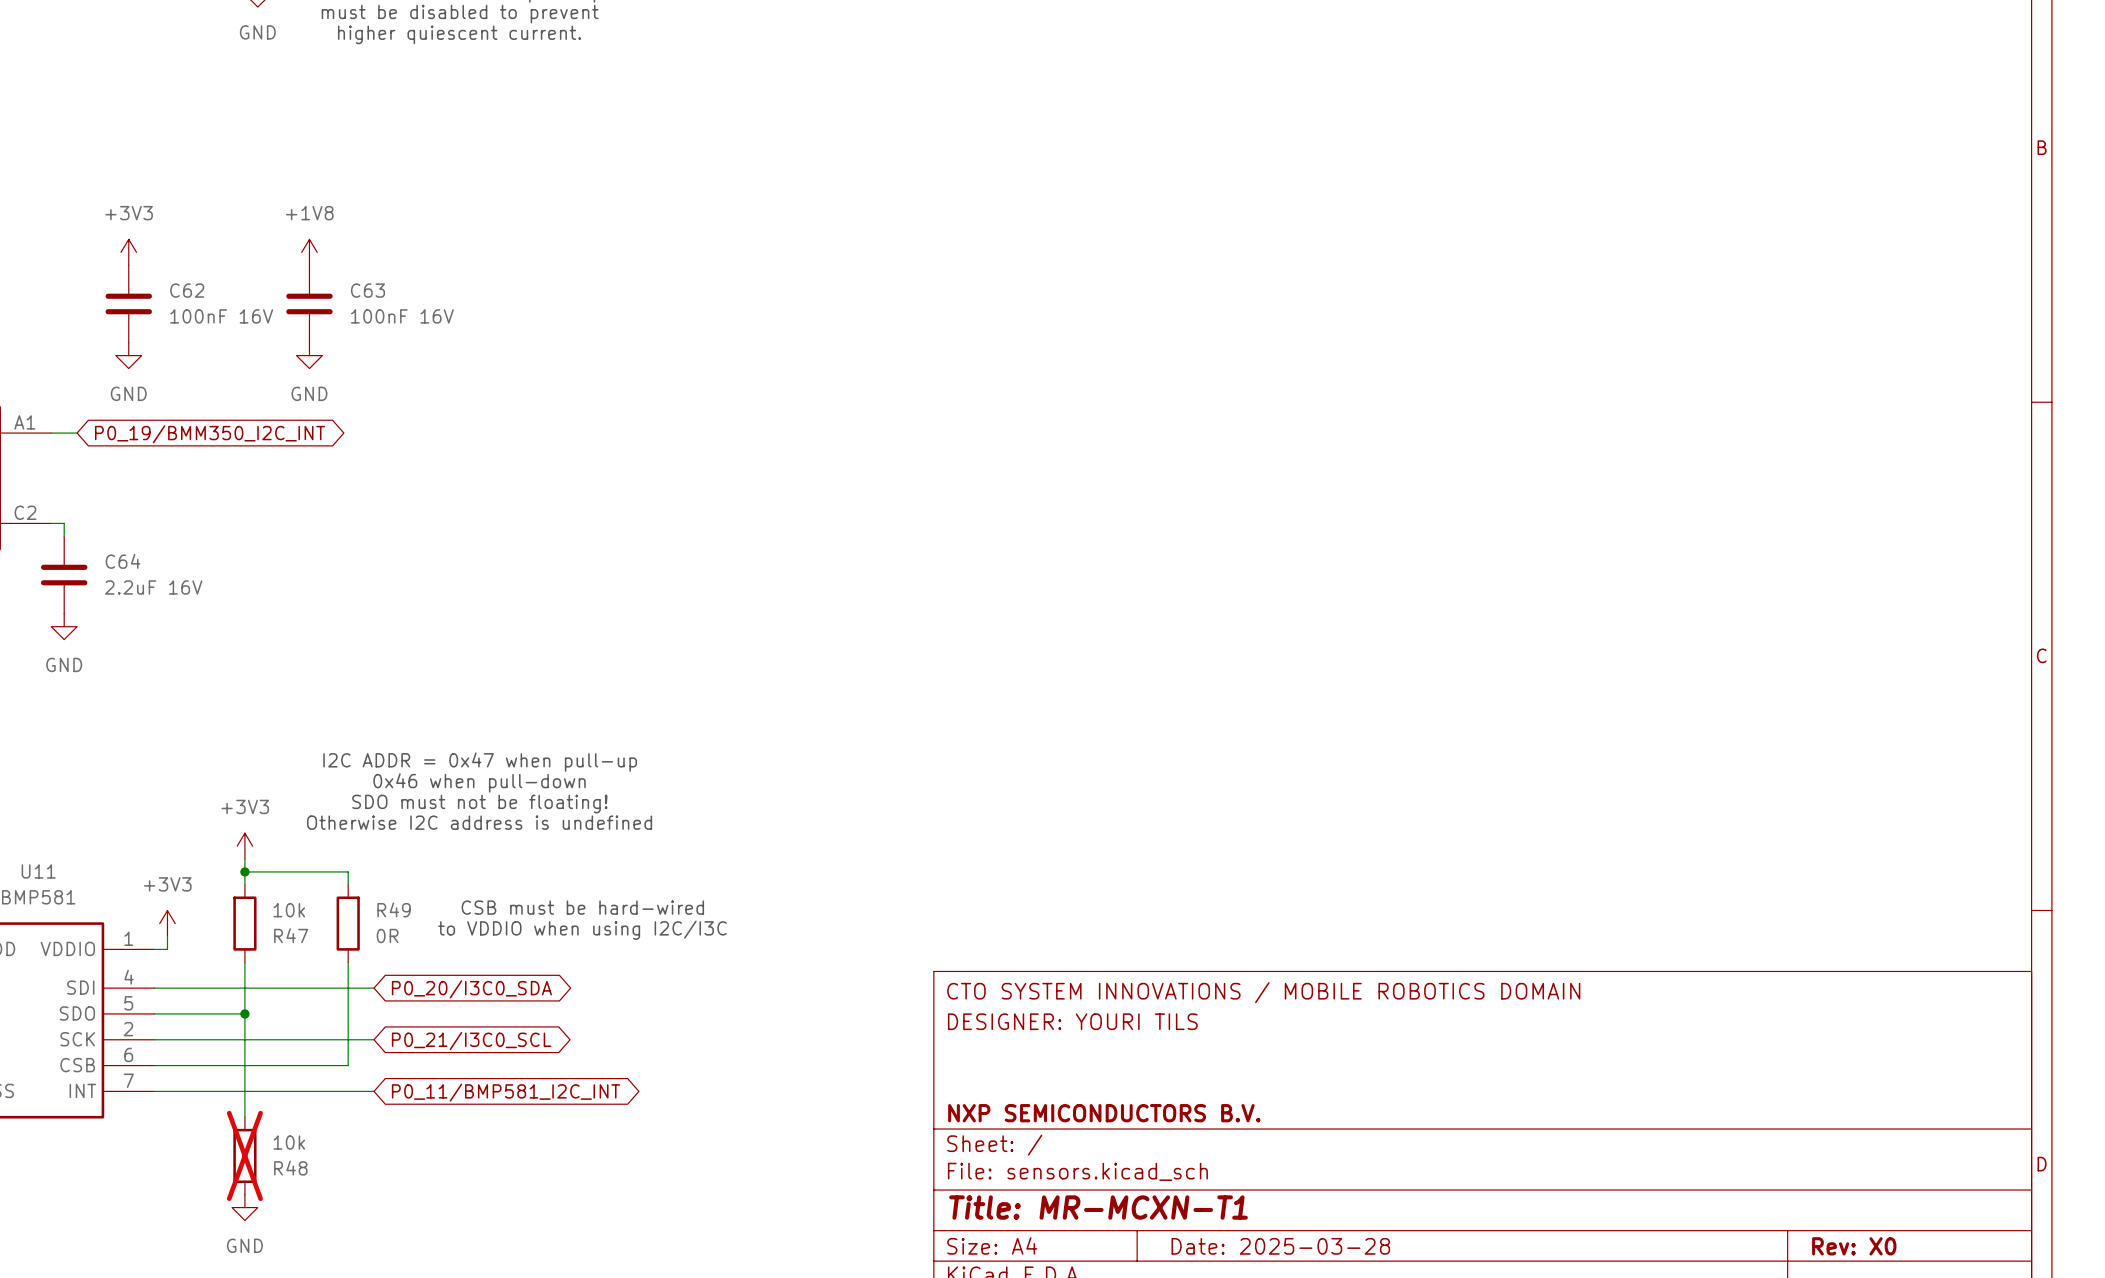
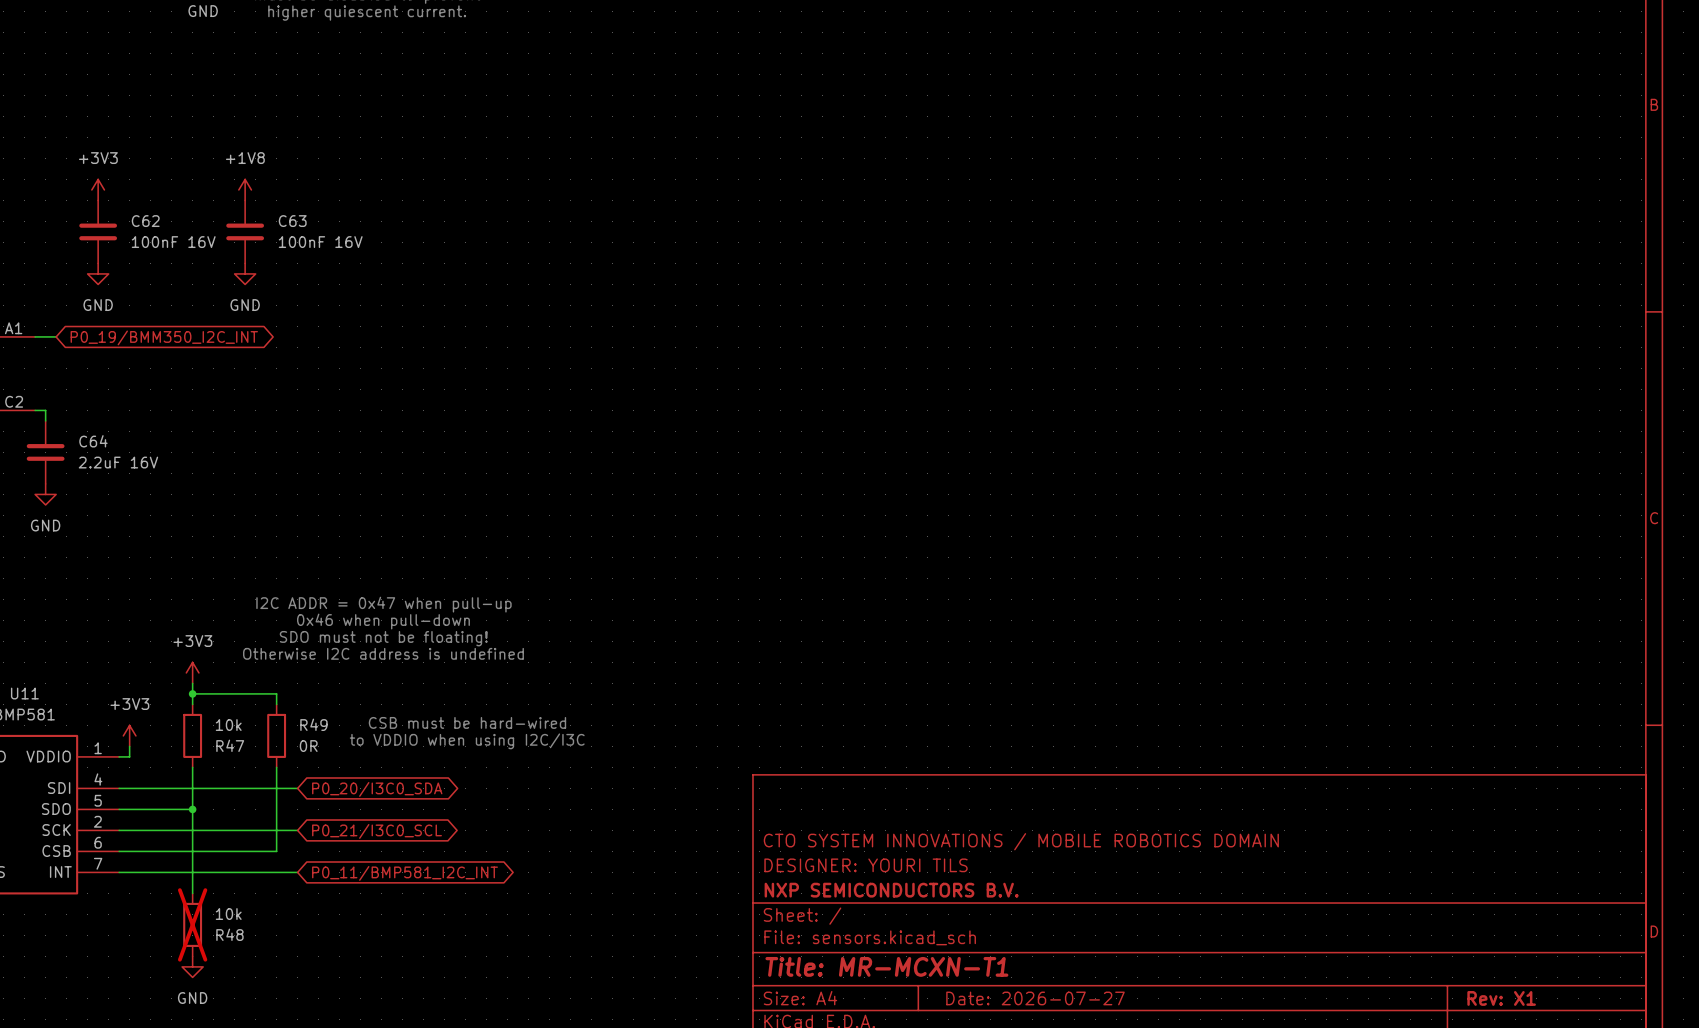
title block position: CTO SYSTEM INNOVATIONS / MOBILE ROBOTICS DOMAIN (1263, 992) -> CTO SYSTEM INNOVATIONS / MOBILE ROBOTICS DOMAIN (1021, 841)
title block position: DESIGNER: YOURI TILS (1072, 1021) -> DESIGNER: YOURI TILS (866, 865)
title block: Date: 2025-03-28 (1280, 1246) -> Date: 2026-07-27 (1035, 998)
title block: Rev: X0 (1854, 1246) -> Rev: X1 (1501, 998)

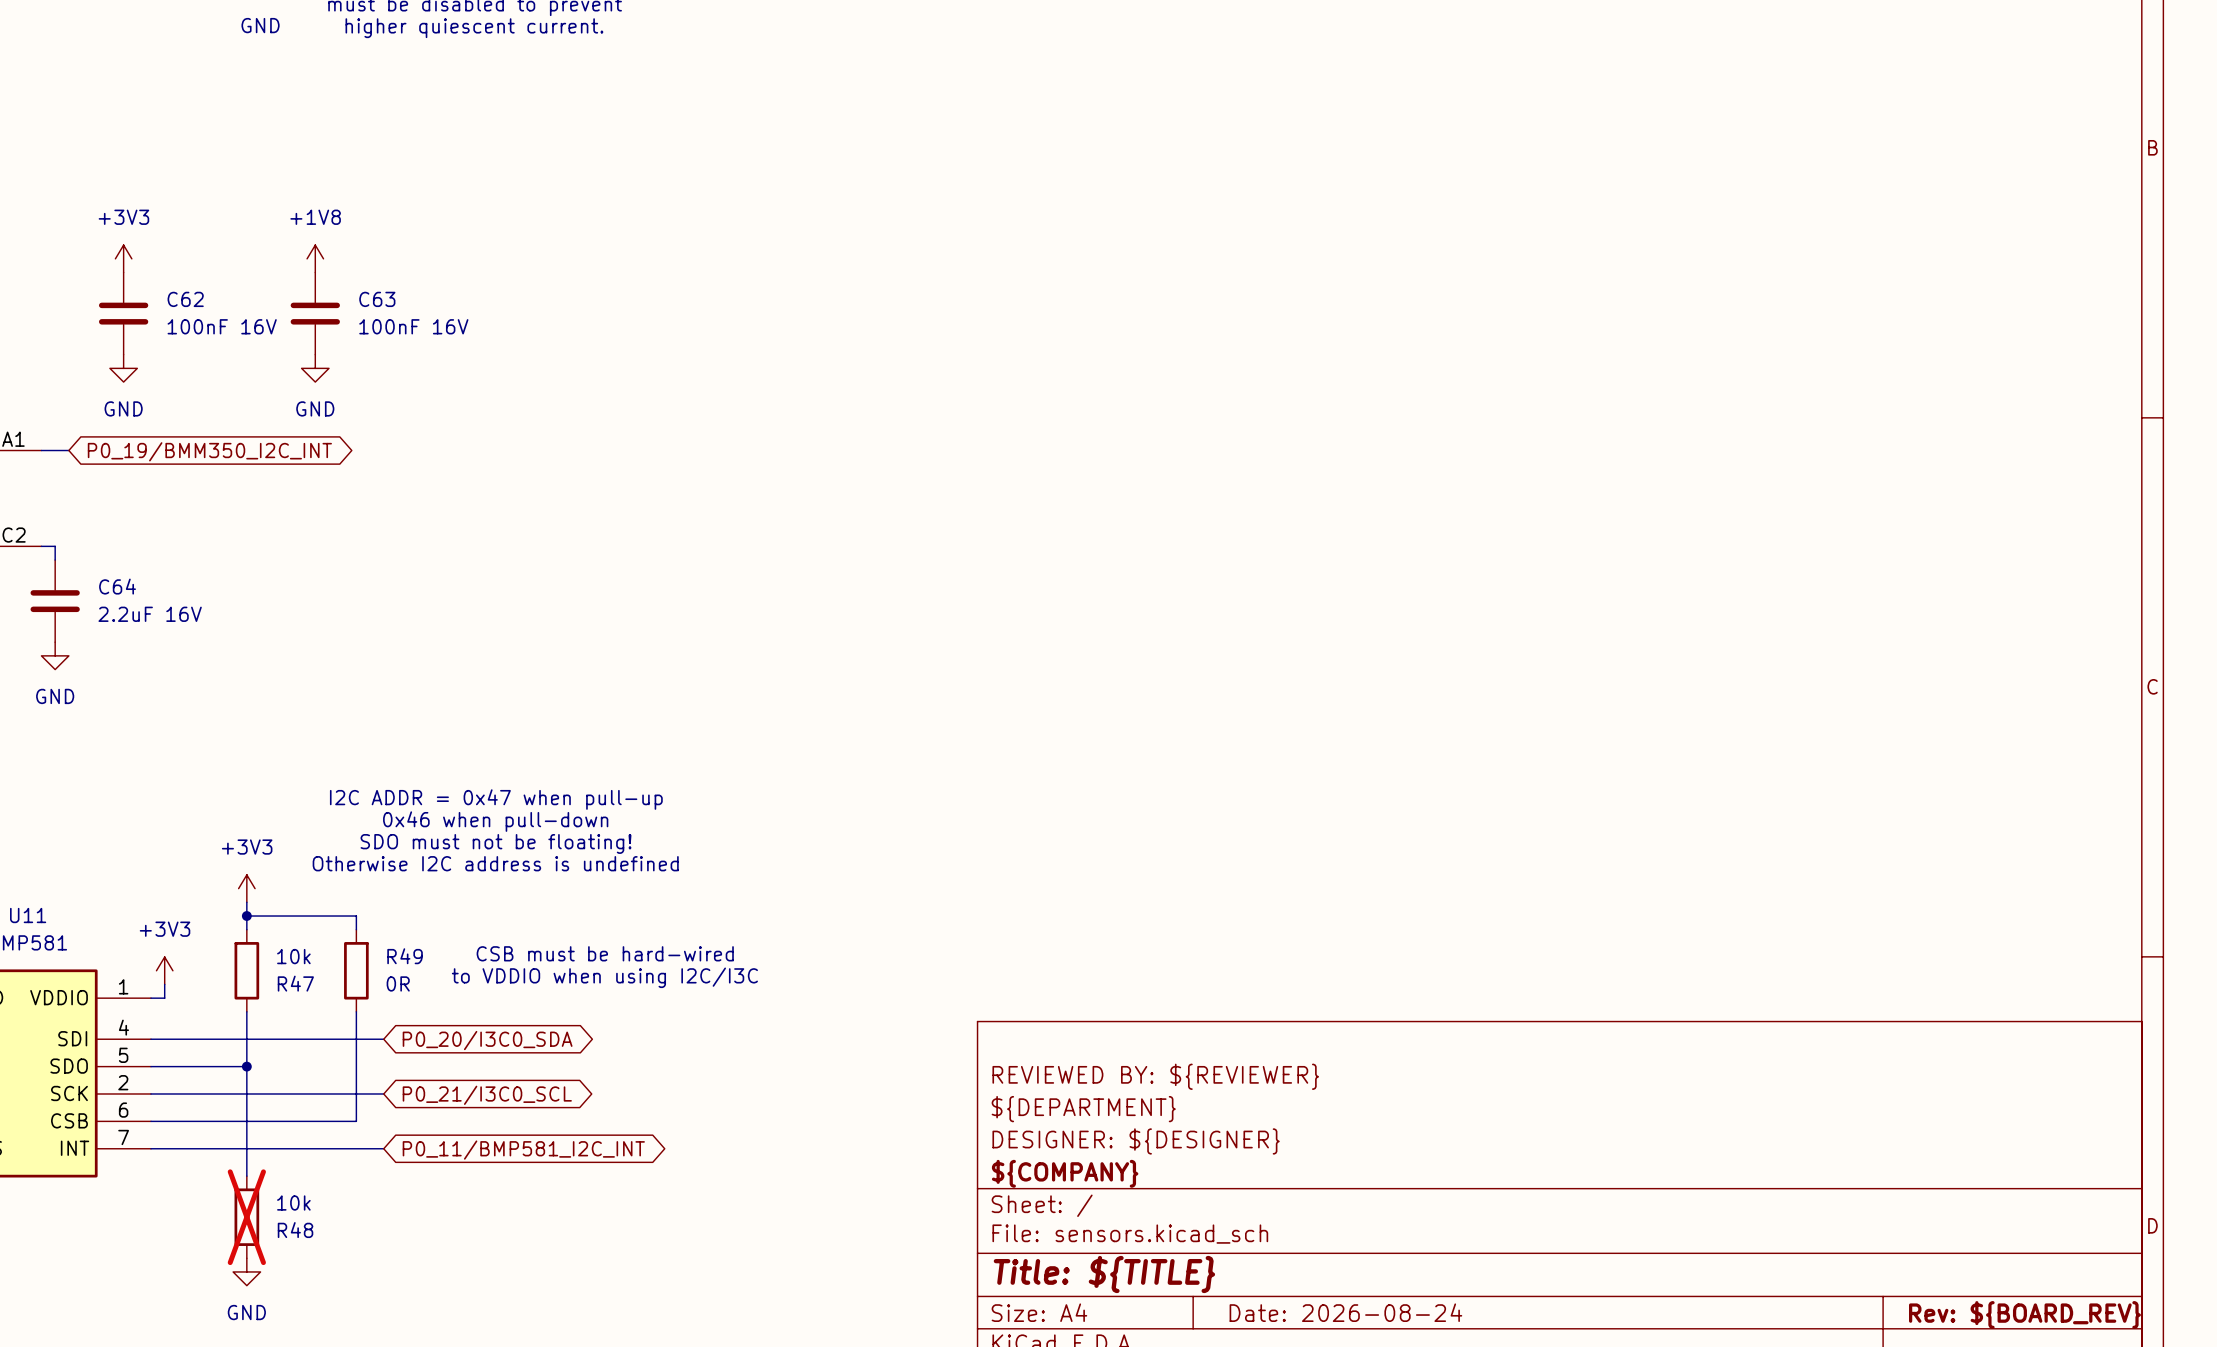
title block: none -> REVIEWED BY: ${REVIEWER} (1155, 1076)
title block: CTO SYSTEM INNOVATIONS / MOBILE ROBOTICS DOMAIN (1021, 841) -> ${DEPARTMENT} (1083, 1109)
title block: DESIGNER: YOURI TILS (866, 865) -> DESIGNER: ${DESIGNER} (1136, 1141)
title block: NXP SEMICONDUCTORS B.V. (891, 890) -> ${COMPANY} (1065, 1173)
title block: Title: MR-MCXN-T1 (886, 966) -> Title: ${TITLE} (1104, 1274)
title block: Date: 2026-07-27 (1035, 998) -> Date: 2026-08-24 (1345, 1312)
title block: Rev: X1 (1501, 998) -> Rev: ${BOARD_REV} (2024, 1315)

